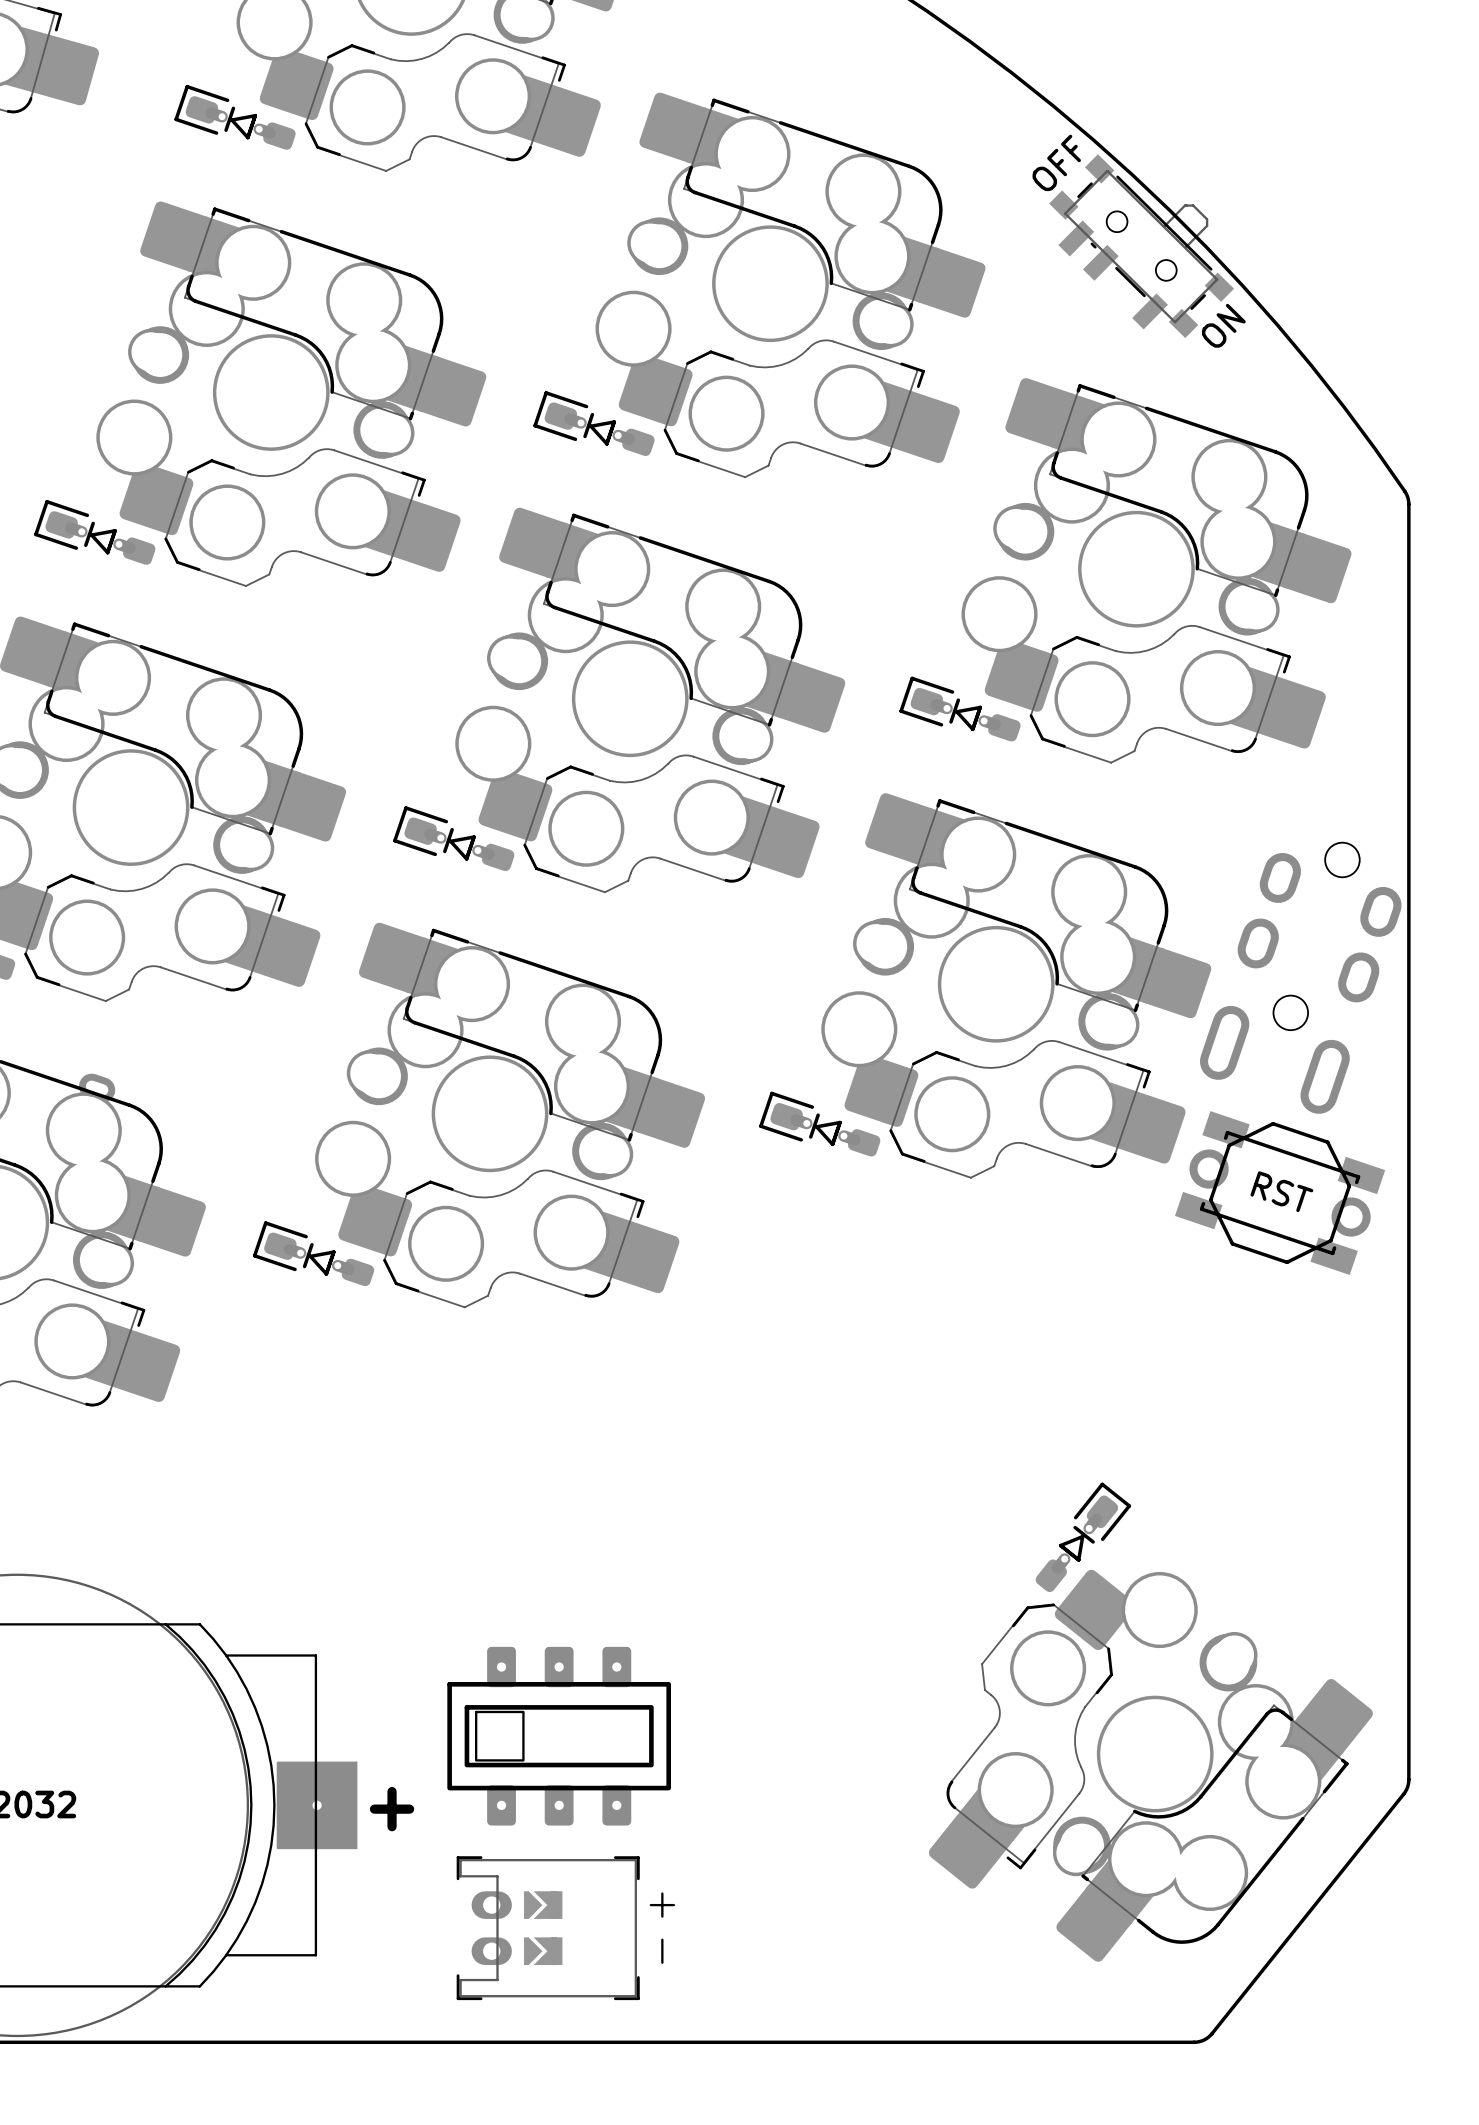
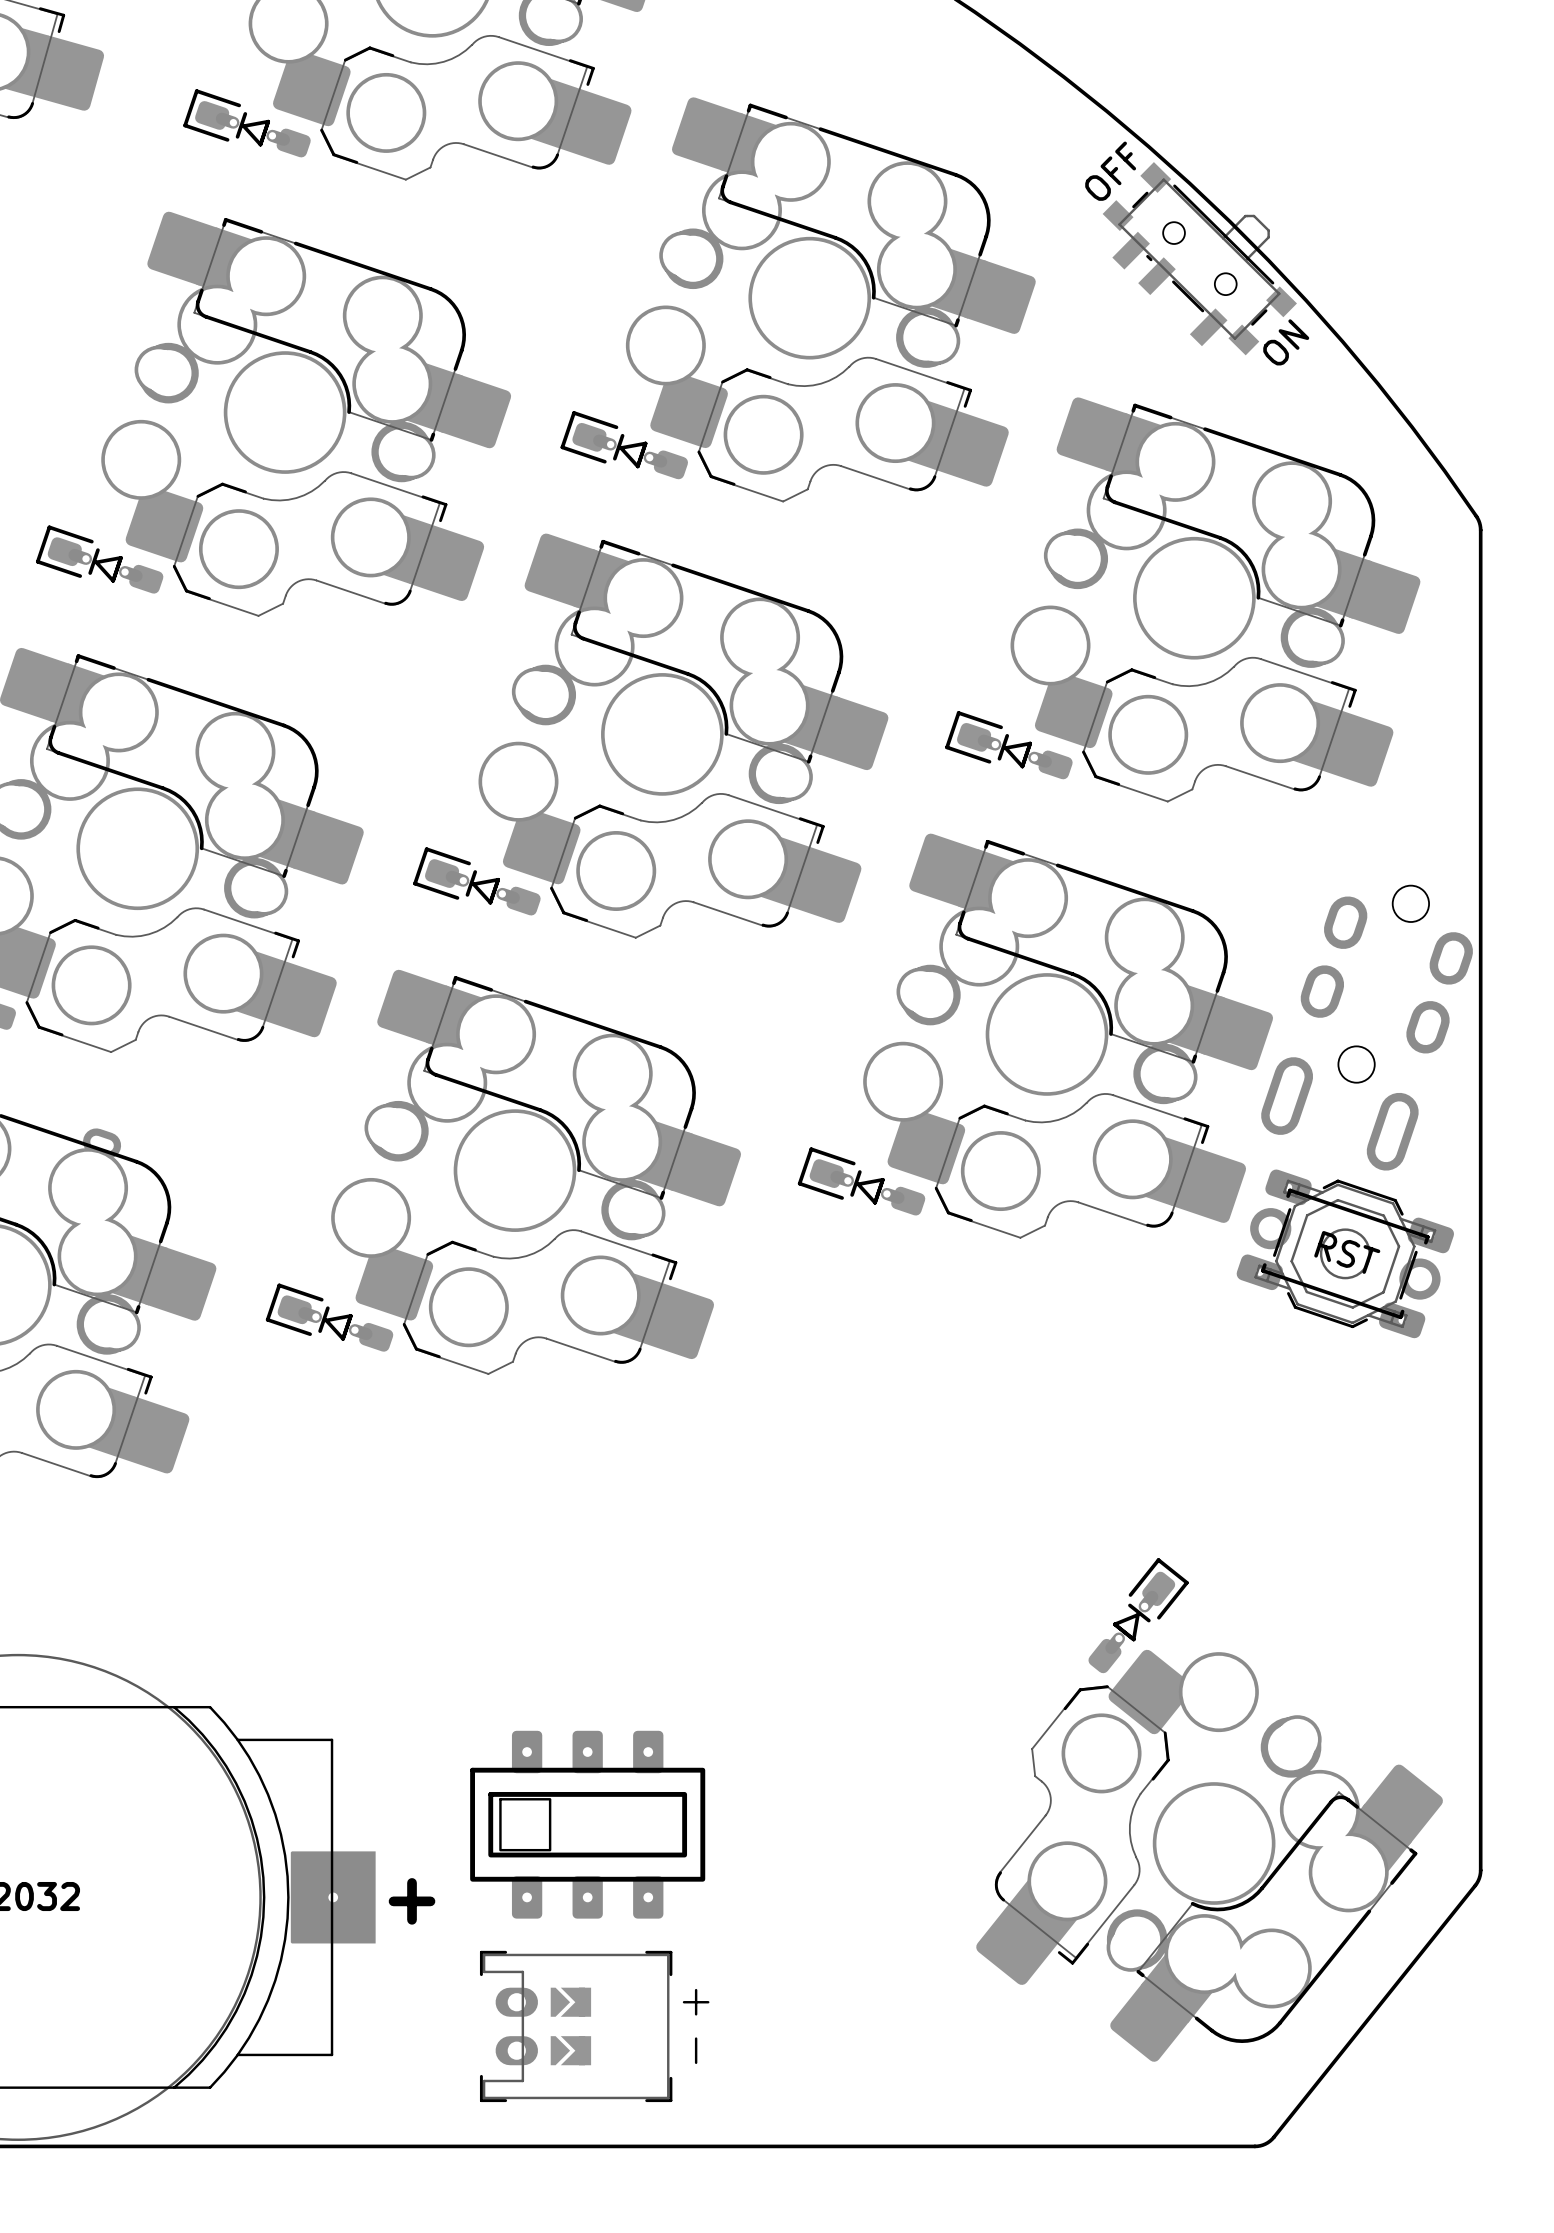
part footprint: [1174, 1111, 1386, 1275] -> [1236, 1169, 1455, 1339]

